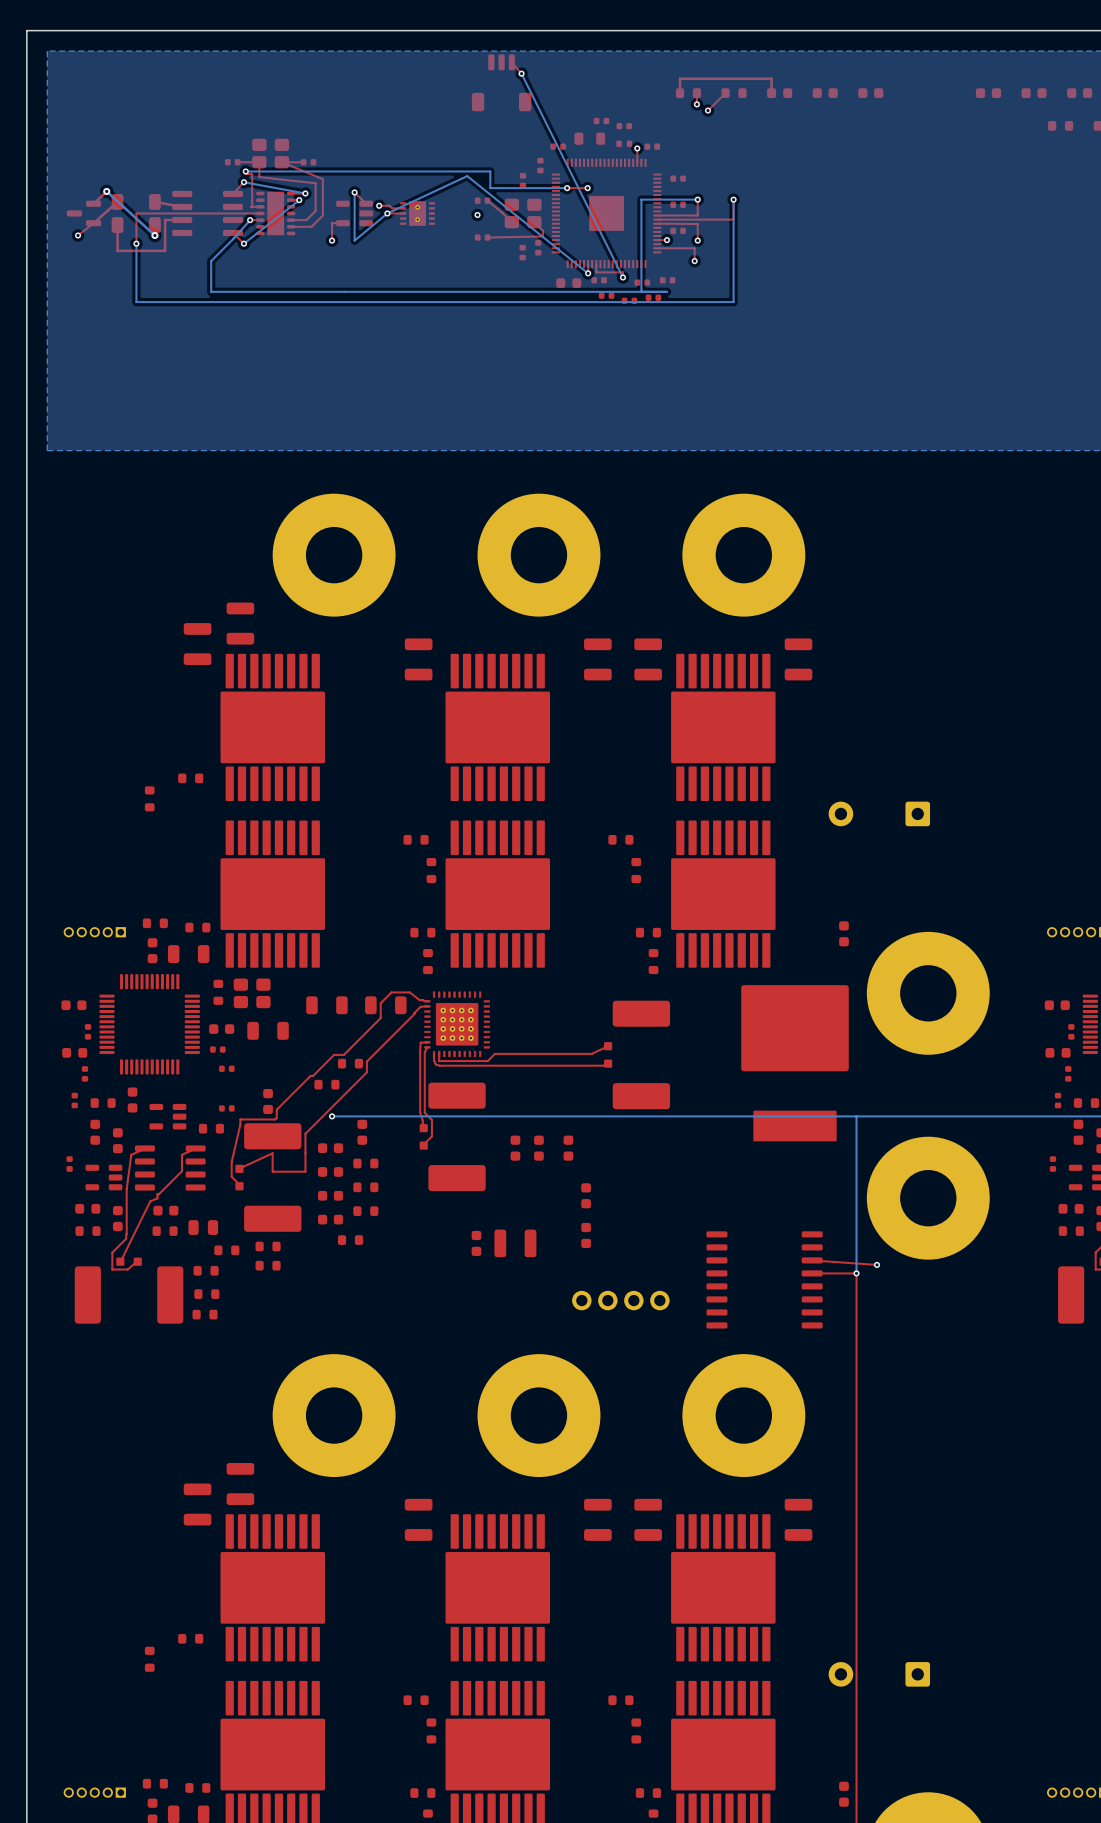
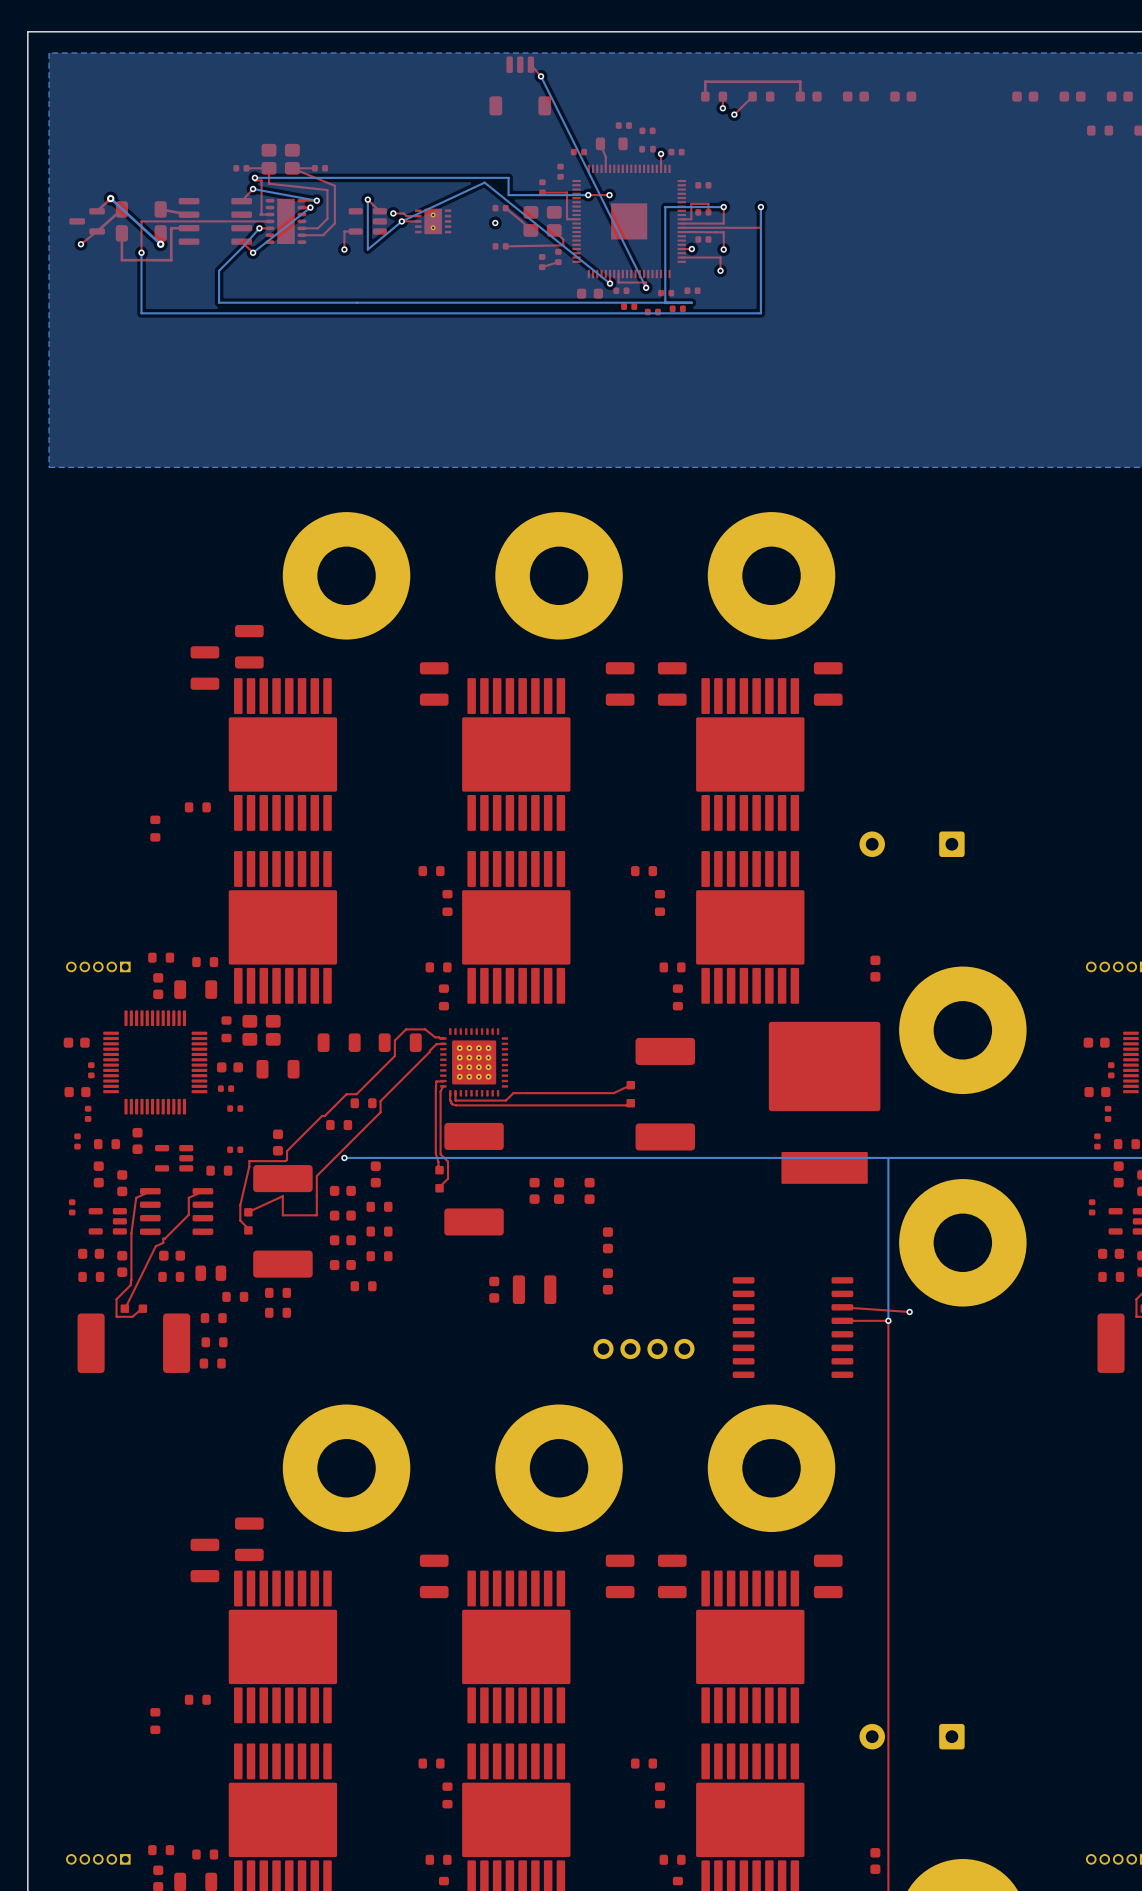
top track: none -> (600, 143) (605, 157) (605, 168)
top track: none -> (542, 192) (567, 192) (567, 219) (576, 219)
top track: none -> (708, 212) (708, 203) (691, 203) (691, 219) (681, 219)
top track: none -> (558, 262) (542, 267)

